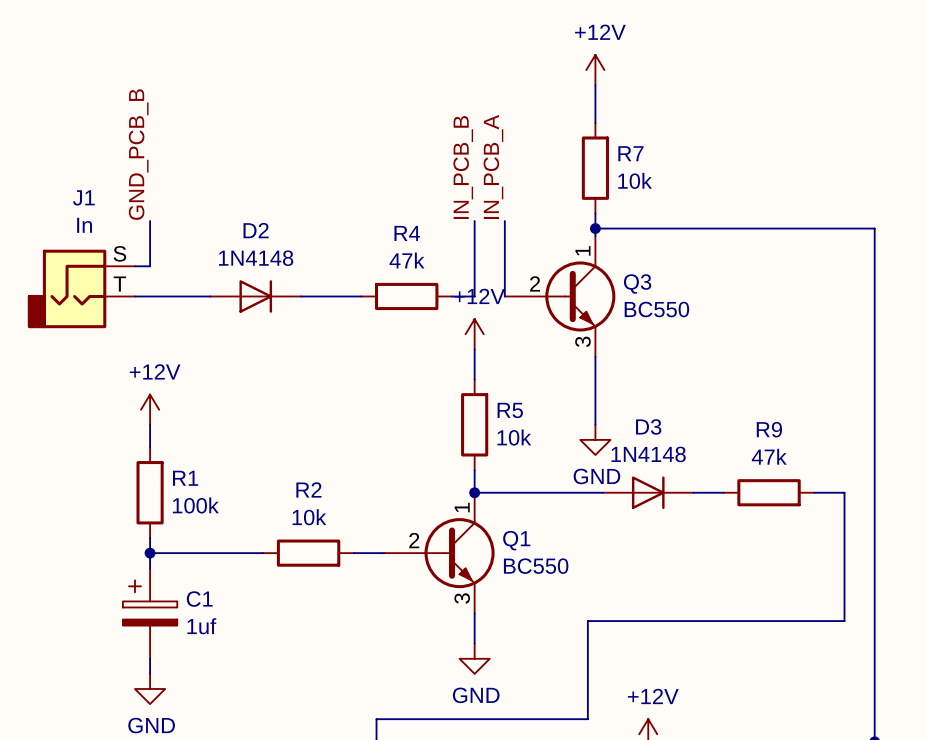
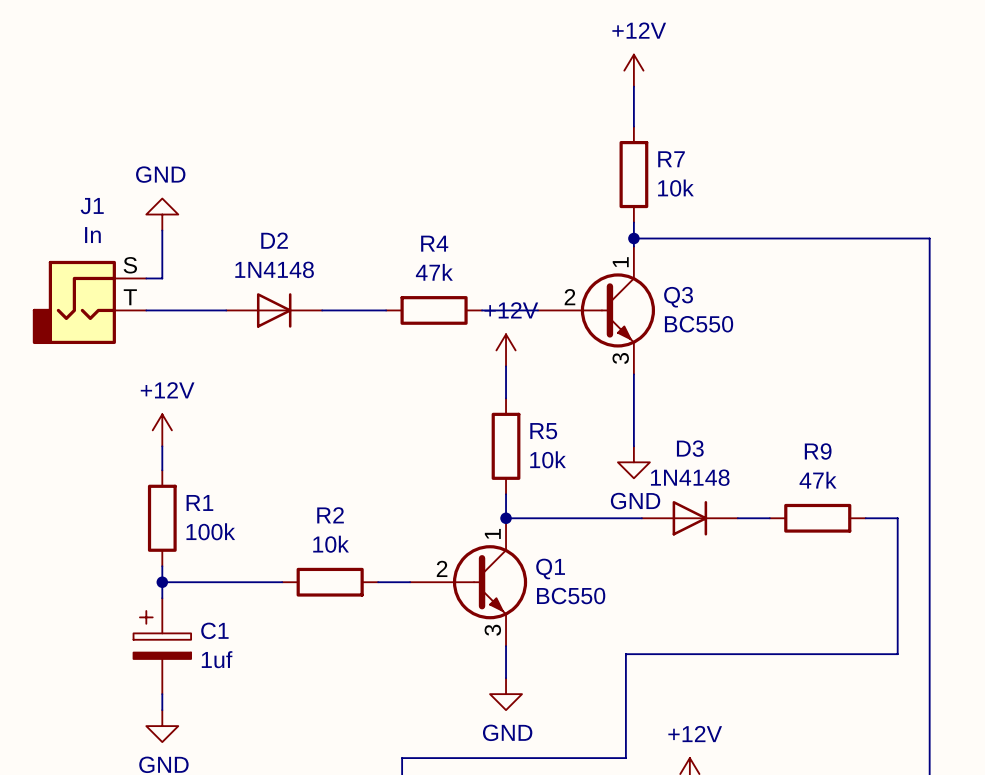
label: GND_PCB_B (138, 154) -> none
label: IN_PCB_A (493, 166) -> none
label: IN_PCB_B (463, 167) -> none
power symbol: none -> GND (162, 214)
wire: (474, 221) (474, 296) -> (537, 310) (506, 310)
wire: (504, 221) (504, 296) -> none

